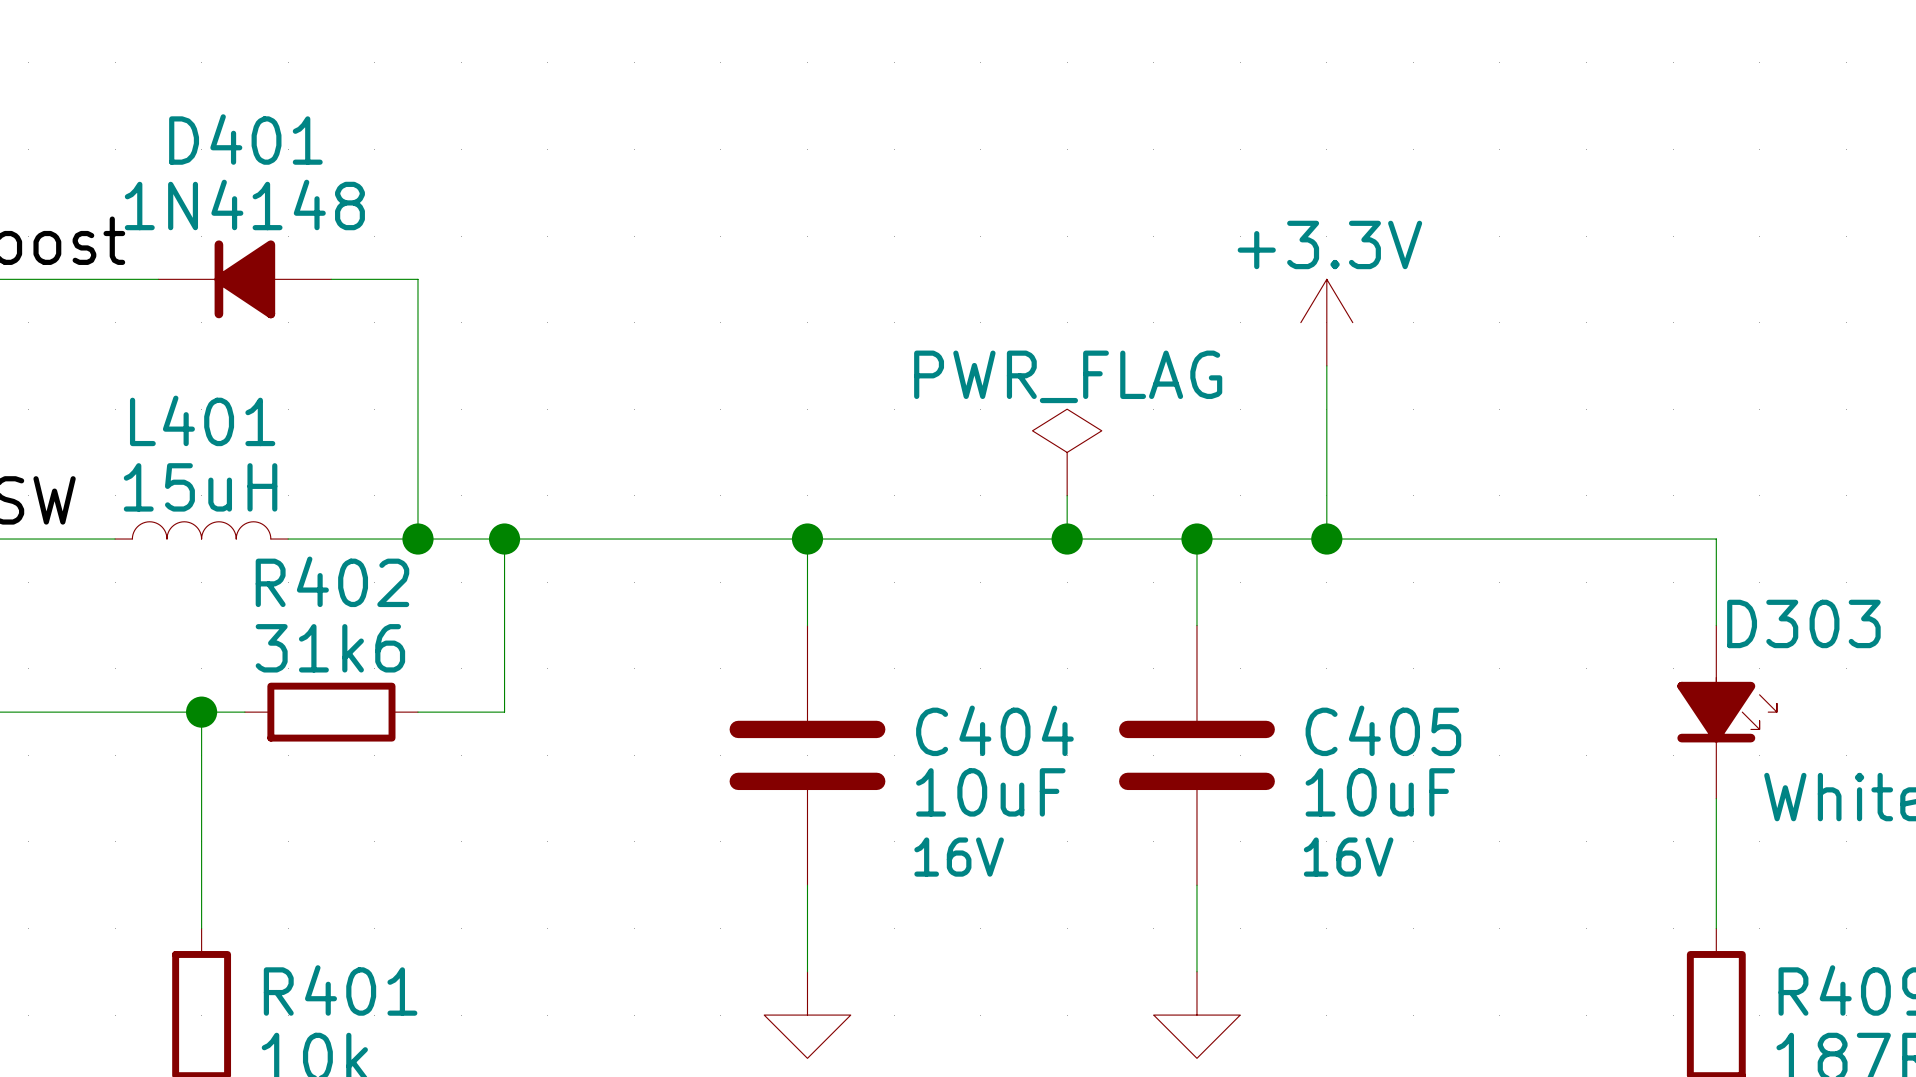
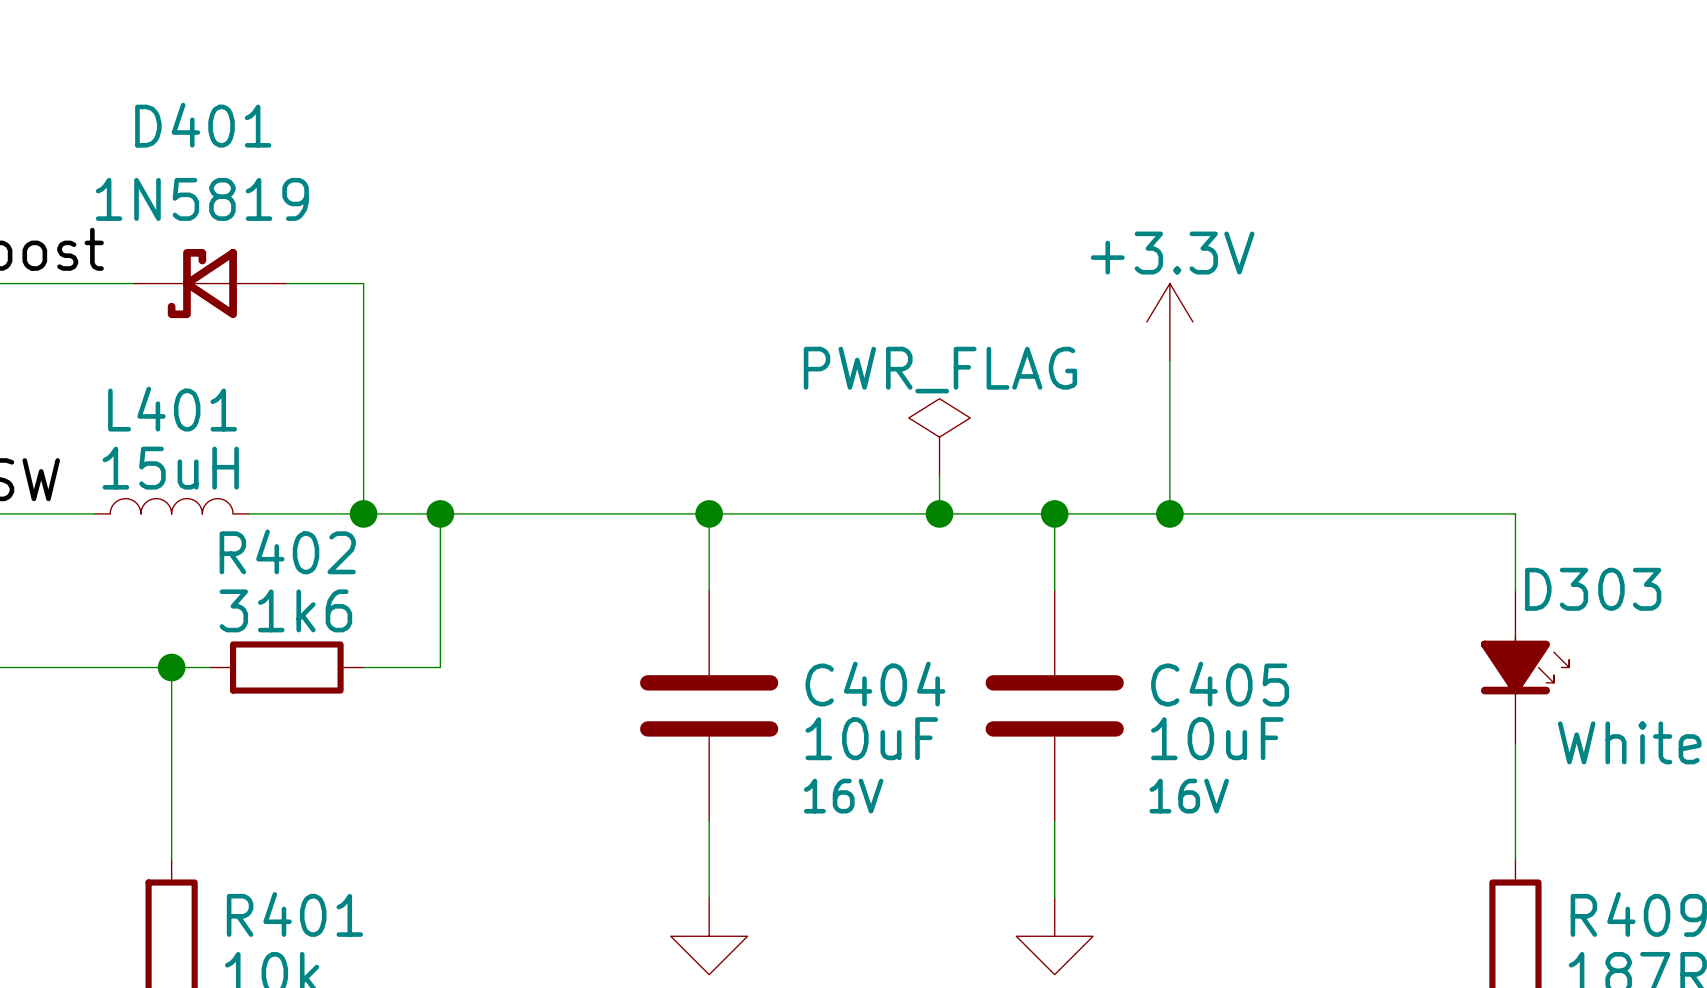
D401 name position: D401 (245, 139) -> D401 (203, 125)
D401 value: 1N4148 (244, 204) -> 1N5819 (202, 199)
D401 symbol: [158, 240, 332, 319] -> [133, 249, 287, 319]

